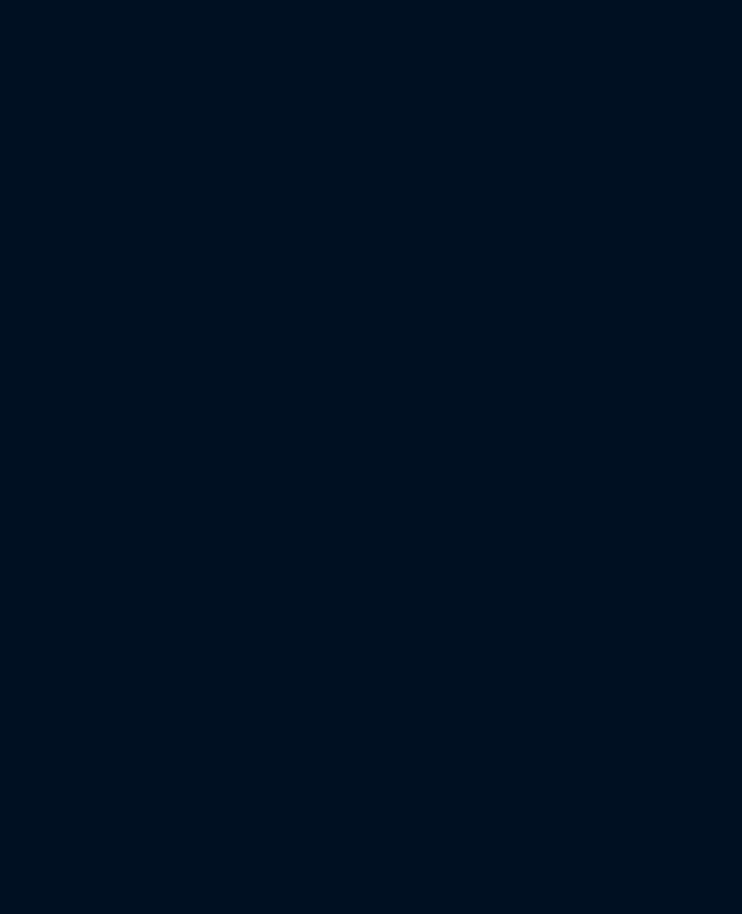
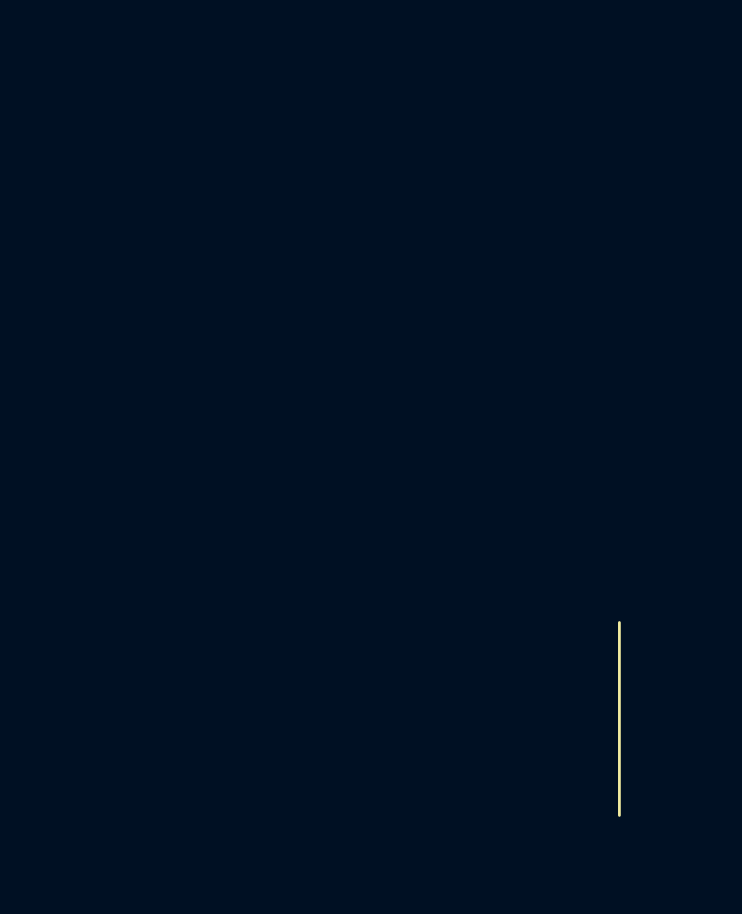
line: none -> (619, 622) (619, 815)

